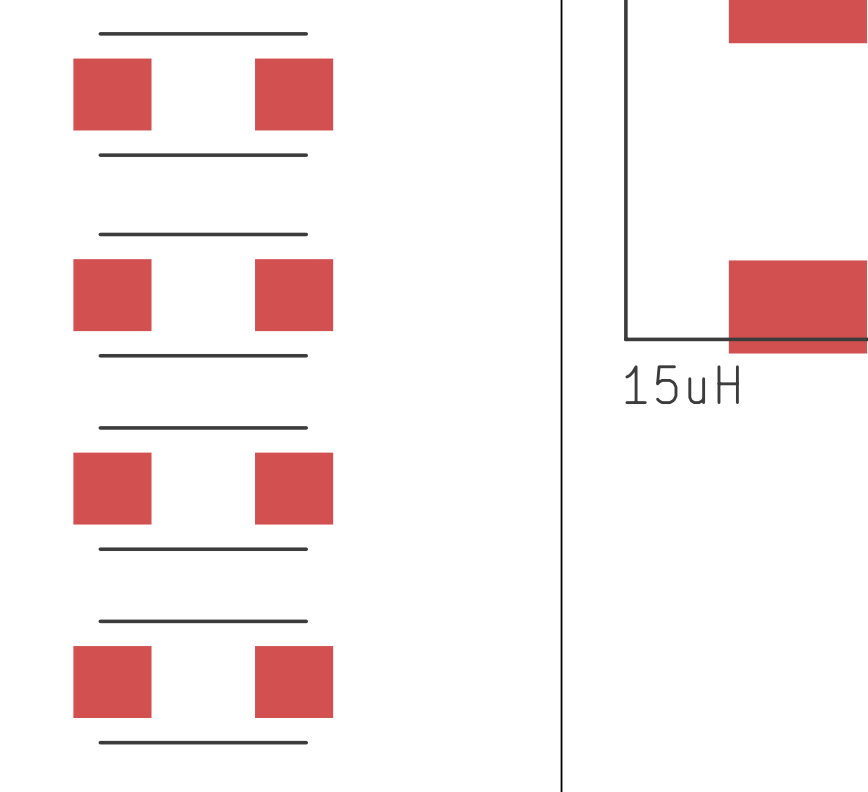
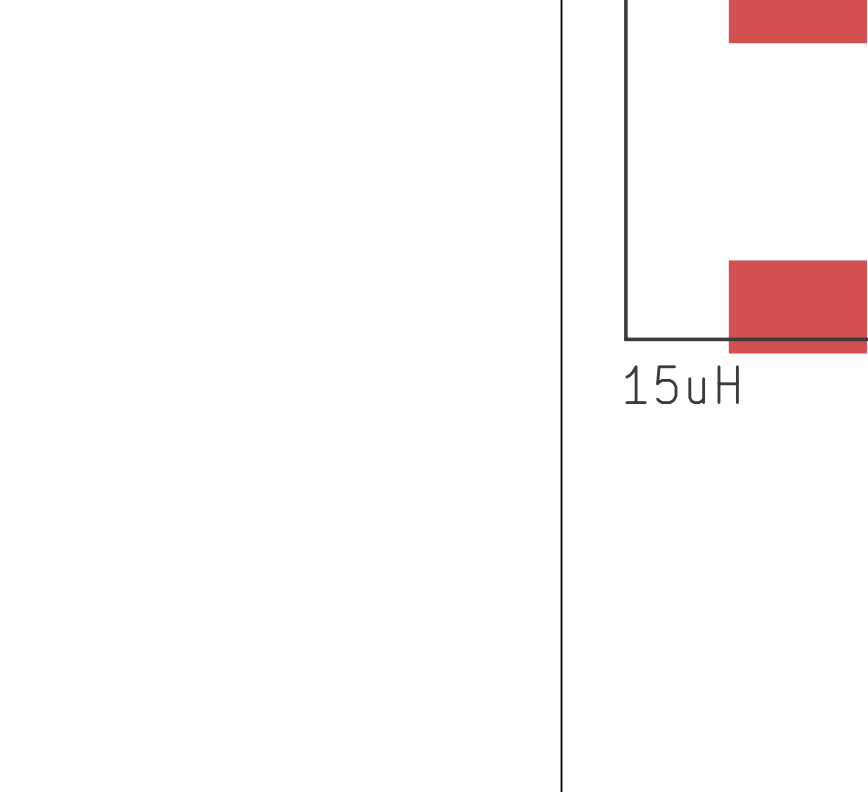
part: (203, 94) -> none
part: (203, 295) -> none
part: (203, 488) -> none
part: (203, 682) -> none

